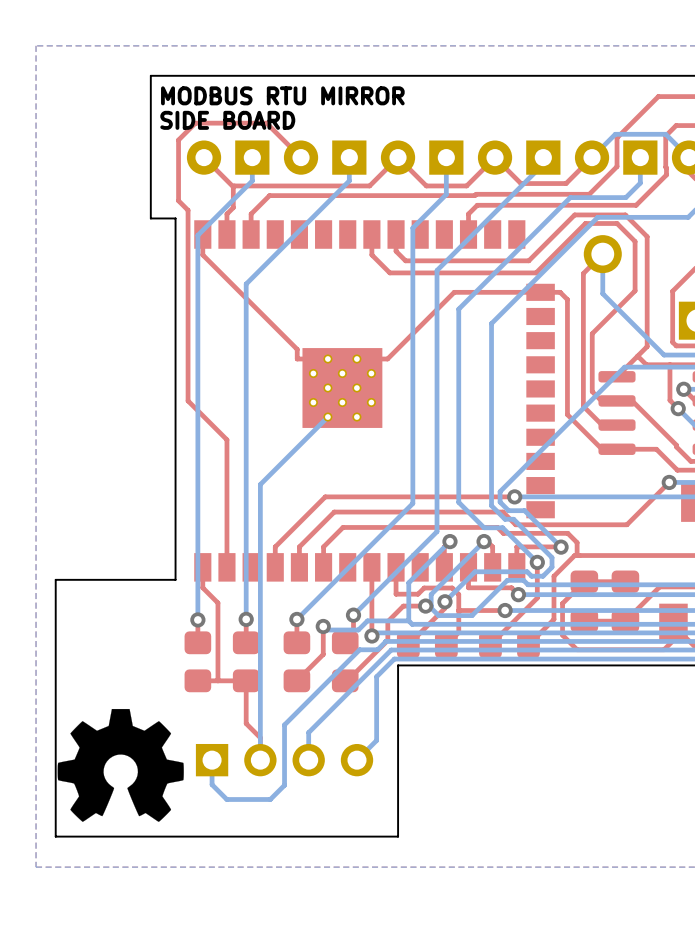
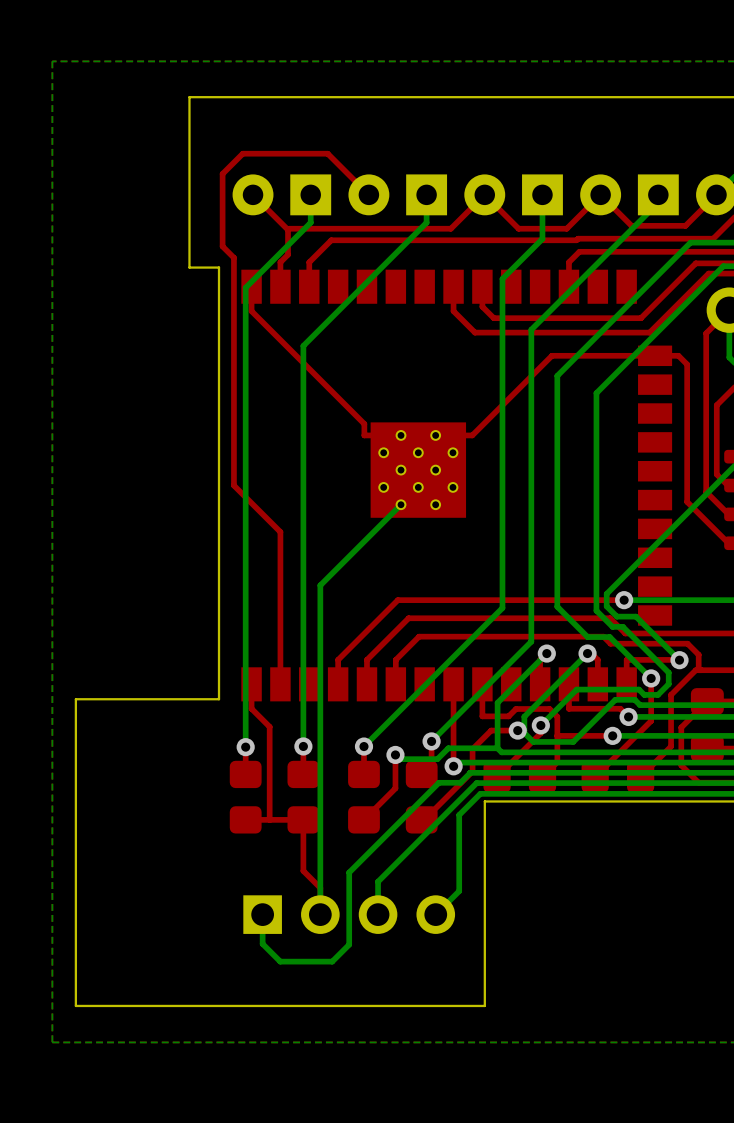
text: MODBUS RTU MIRROR (282, 95) -> none
text: SIDE BOARD (227, 120) -> none
drawing: [57, 708, 184, 822] -> none

